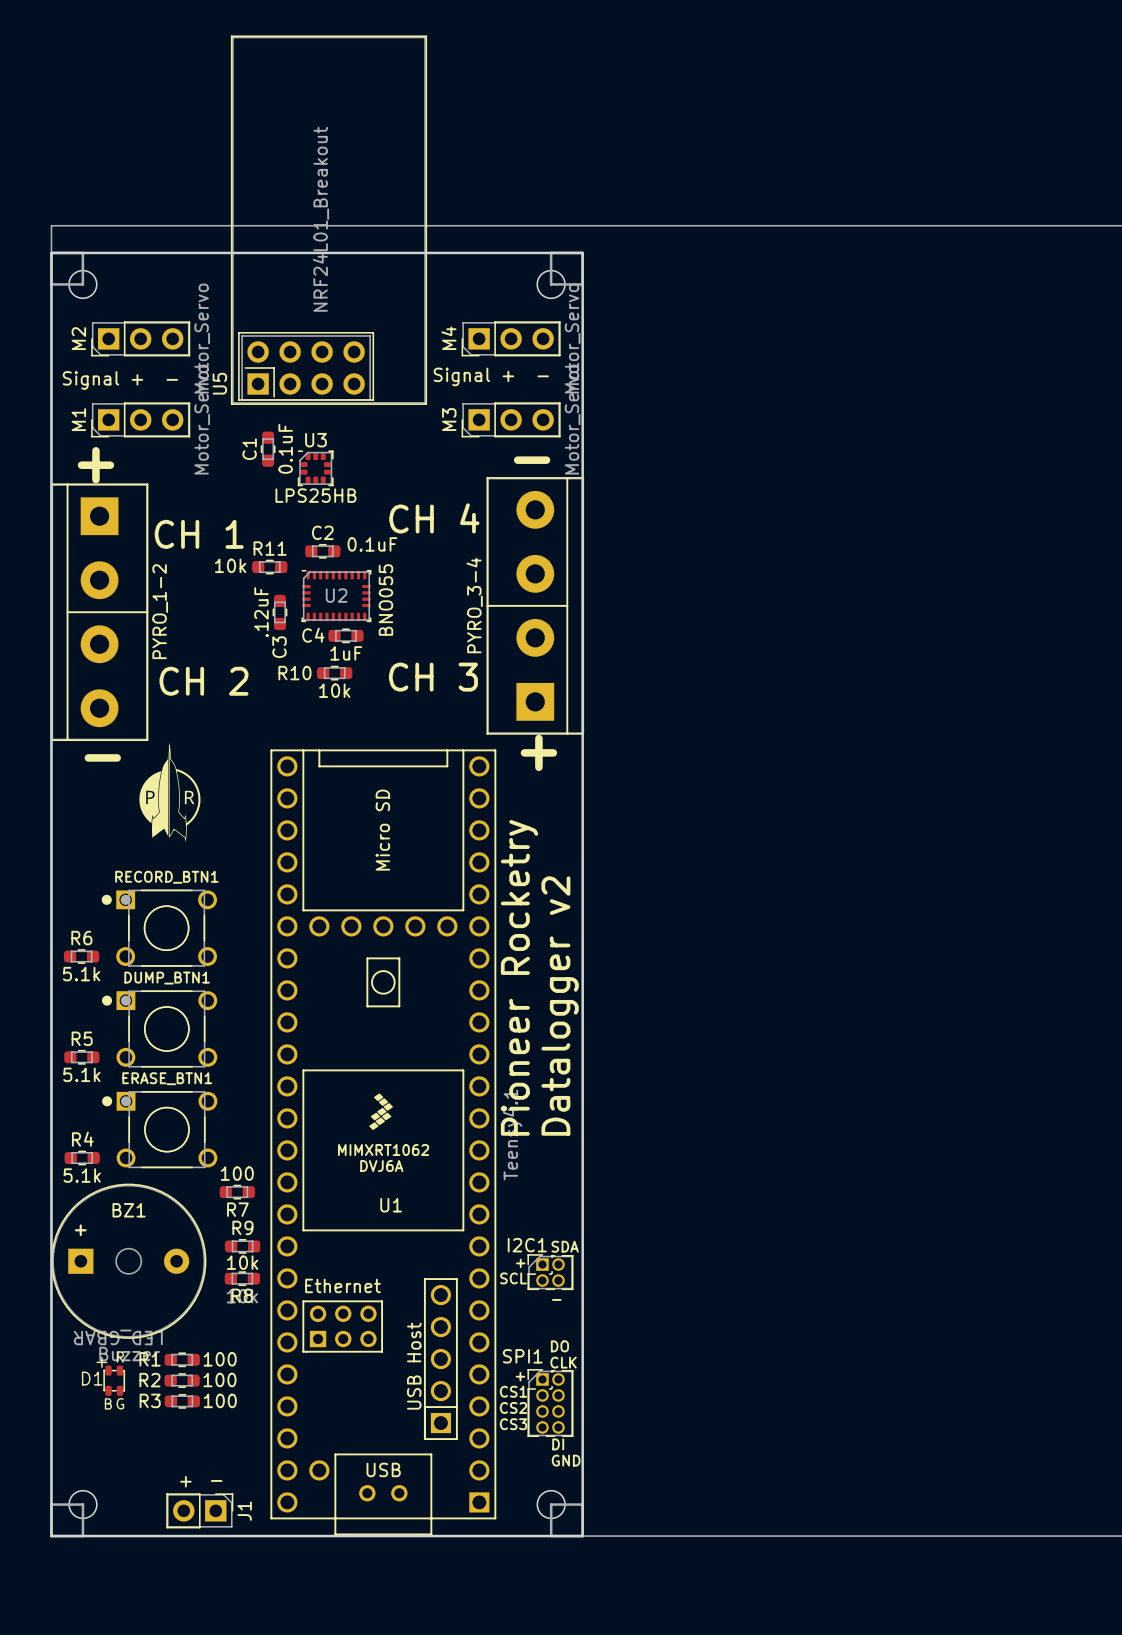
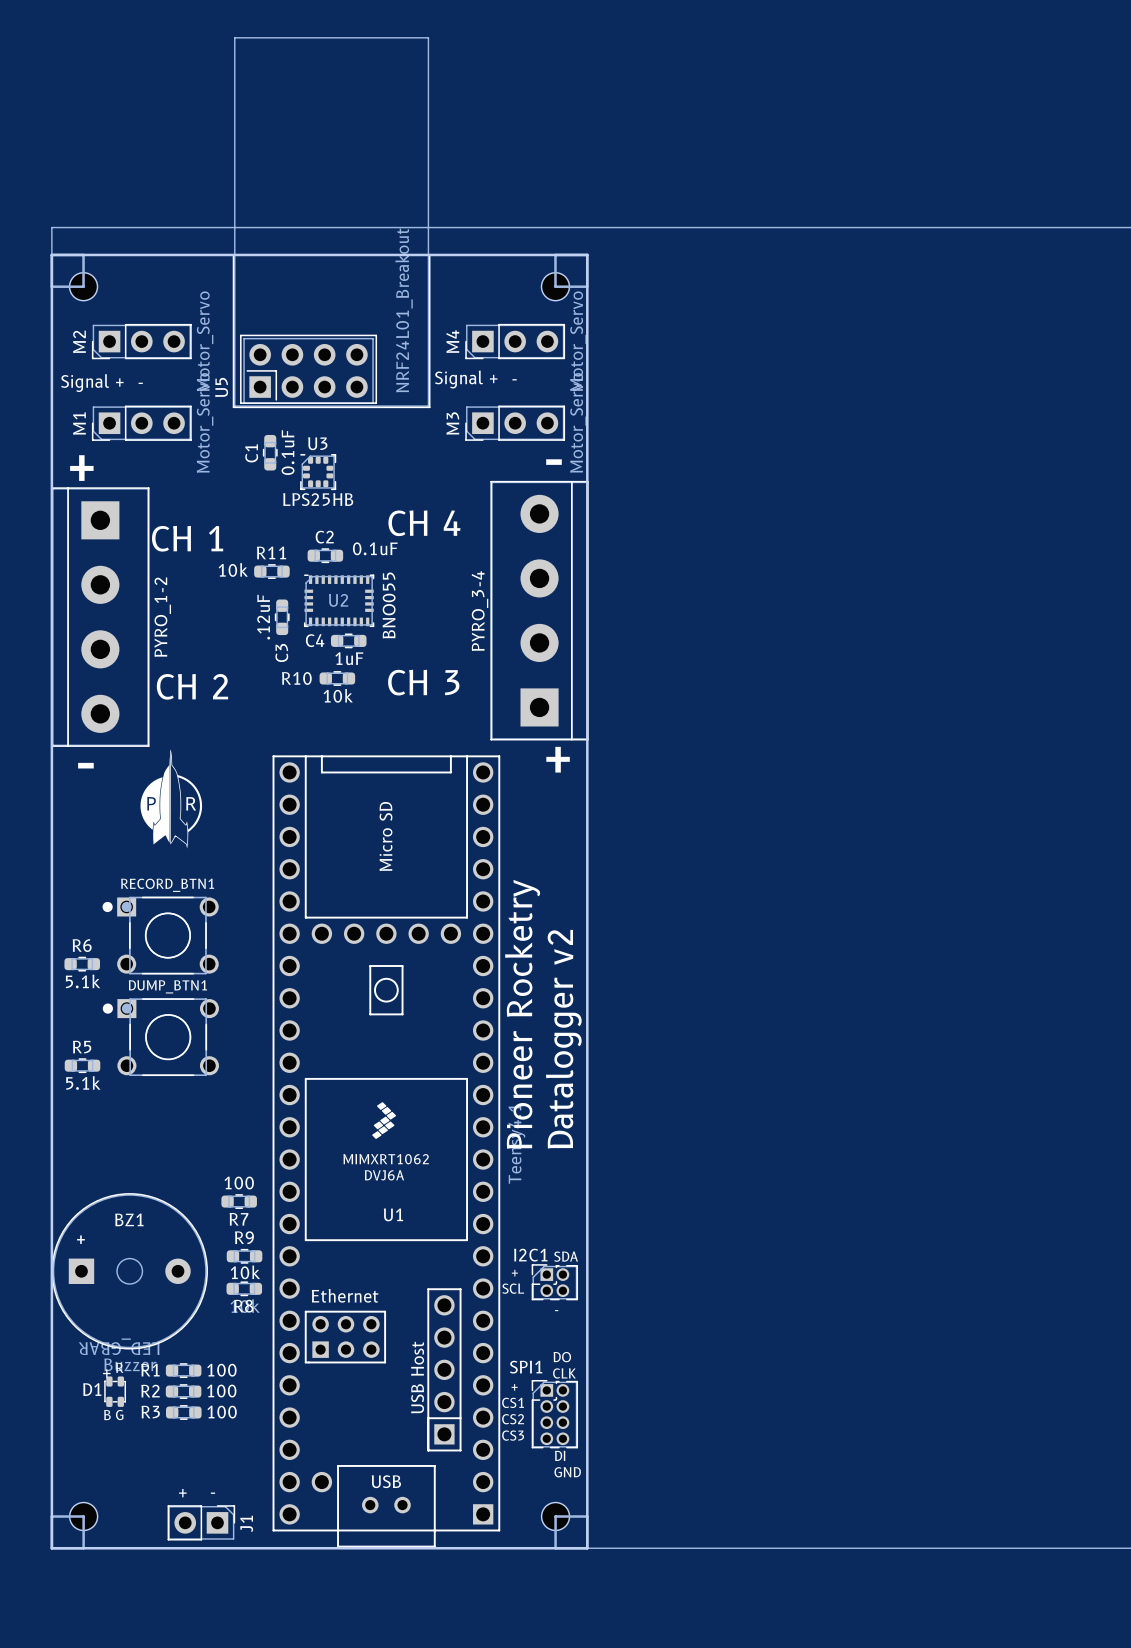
U5 footprint: [230, 35, 428, 405] -> [232, 37, 431, 409]
U5 value position: NRF24L01_Breakout (320, 219) -> NRF24L01_Breakout (404, 310)
line: (487, 605) (567, 605) -> none
line: (67, 612) (147, 612) -> none
ERASE_BTN1: (159, 1129) -> none
R4: 5.1k (82, 1157) -> none

